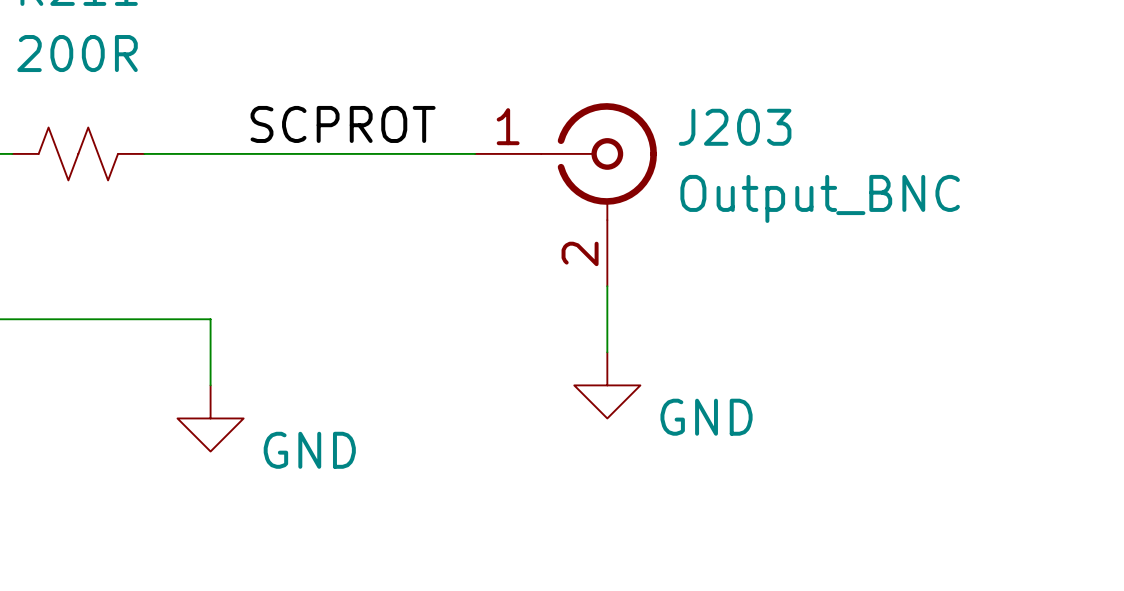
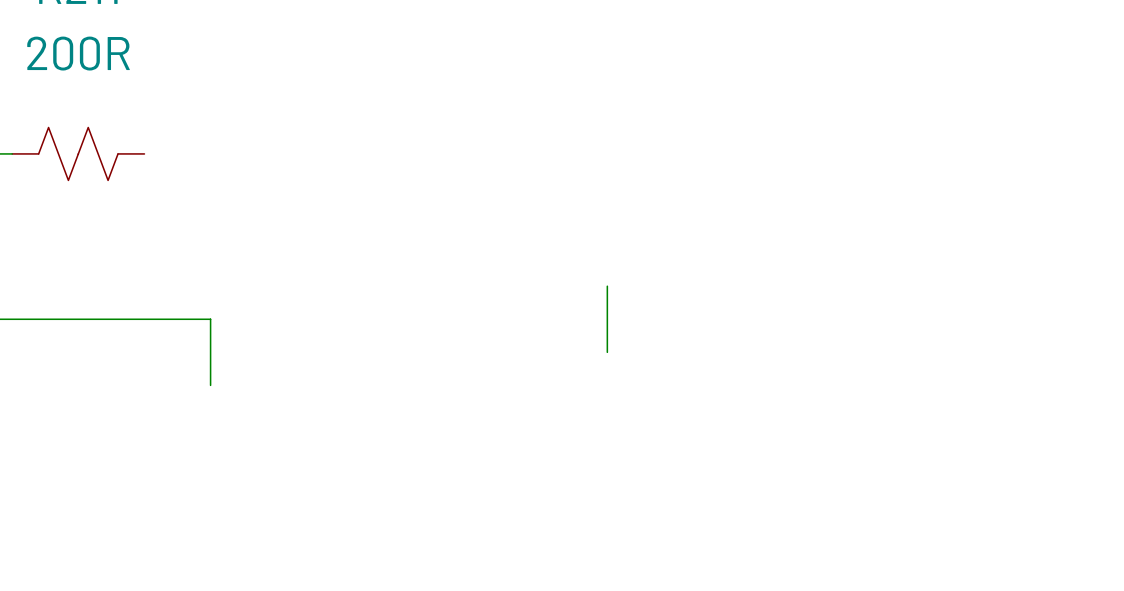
label: SCPROT (343, 124) -> none
wire: (144, 153) (475, 153) -> none
J203: Output_BNC (566, 194) -> none
power symbol: GND (607, 385) -> none
power symbol: GND (210, 418) -> none

